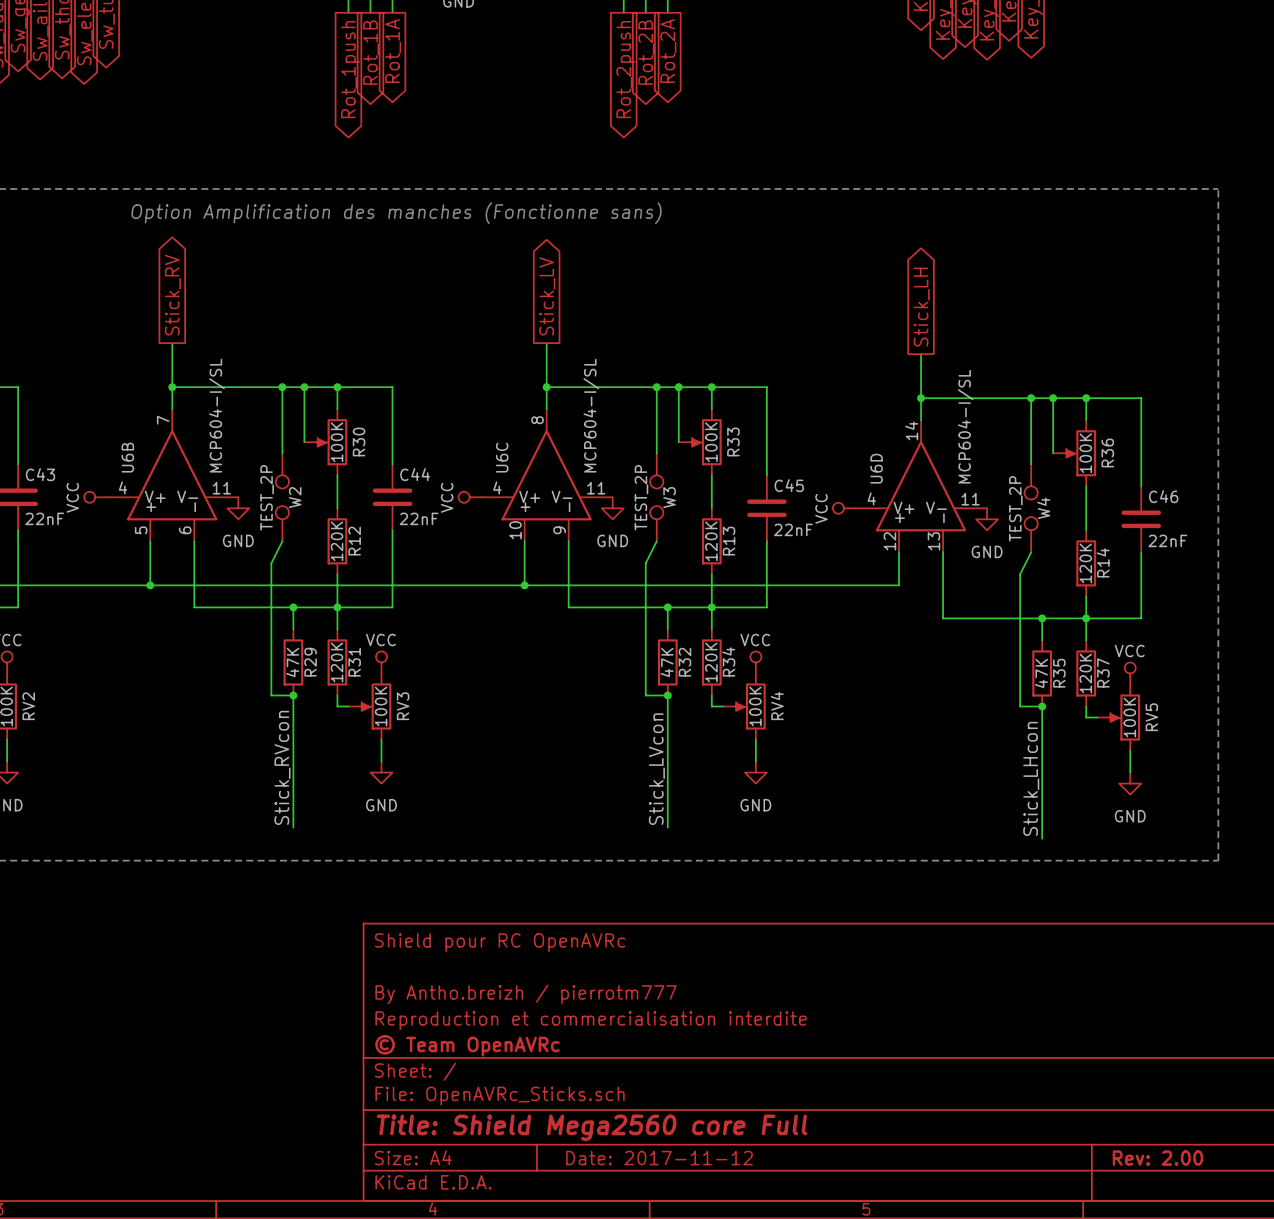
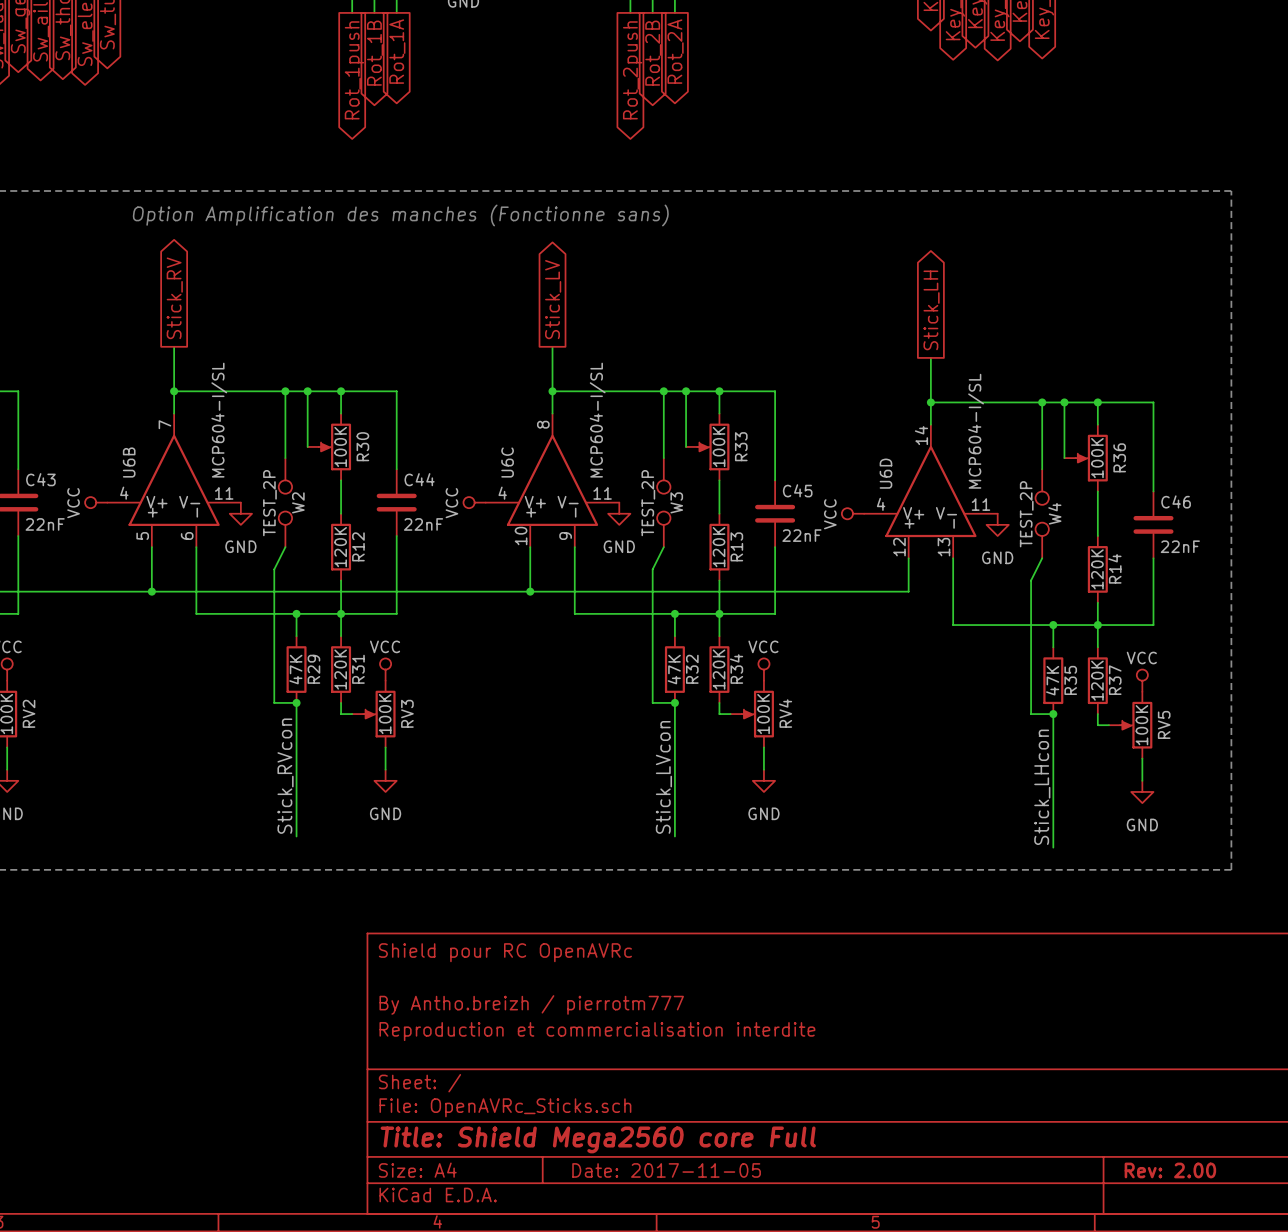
title block: © Team OpenAVRc (467, 1045) -> none
title block: Date: 2017-11-12 (659, 1158) -> Date: 2017-11-05 (666, 1170)

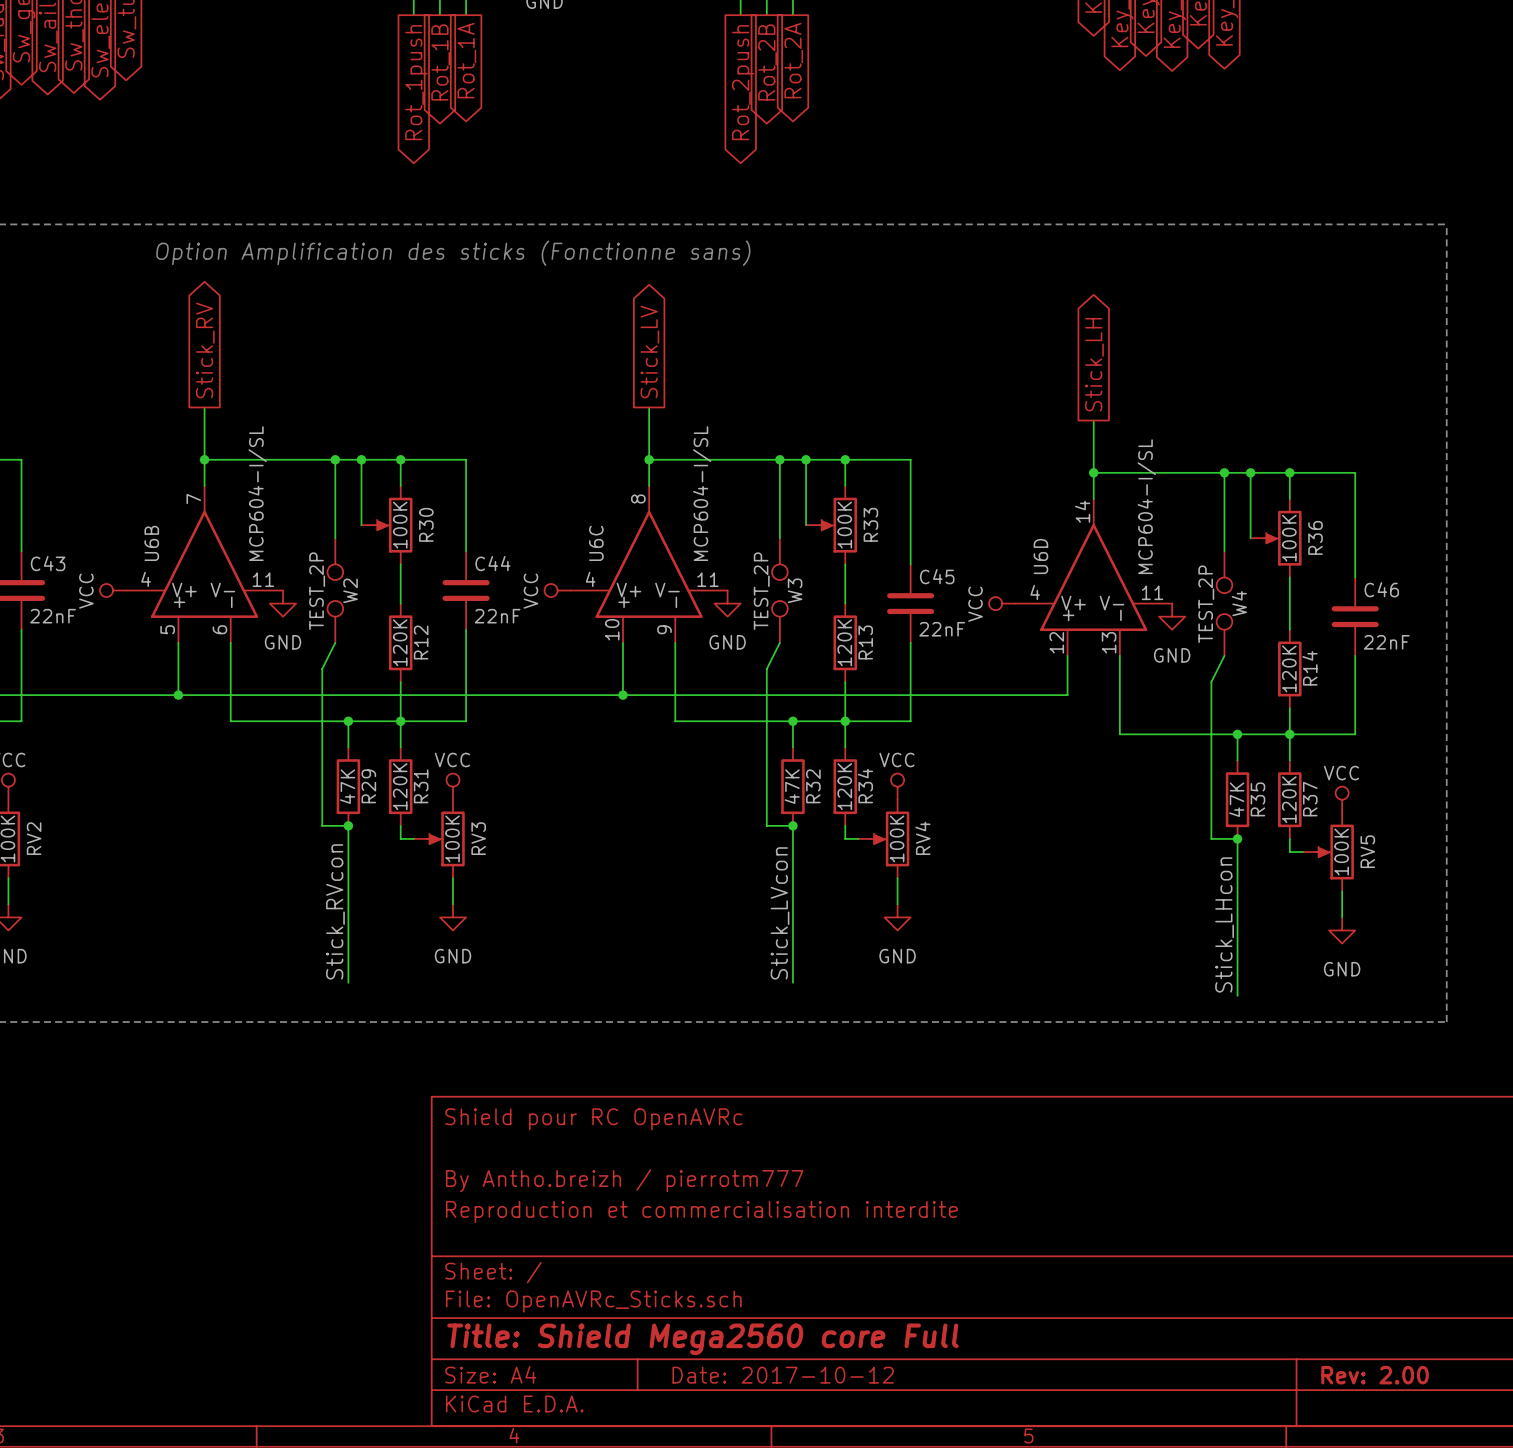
text: Option Amplification des manches (Fonctionne sans) (400, 215) -> Option Amplification des sticks (Fonctionne sans) (453, 253)
title block: Date: 2017-11-05 (666, 1170) -> Date: 2017-10-12 (783, 1375)

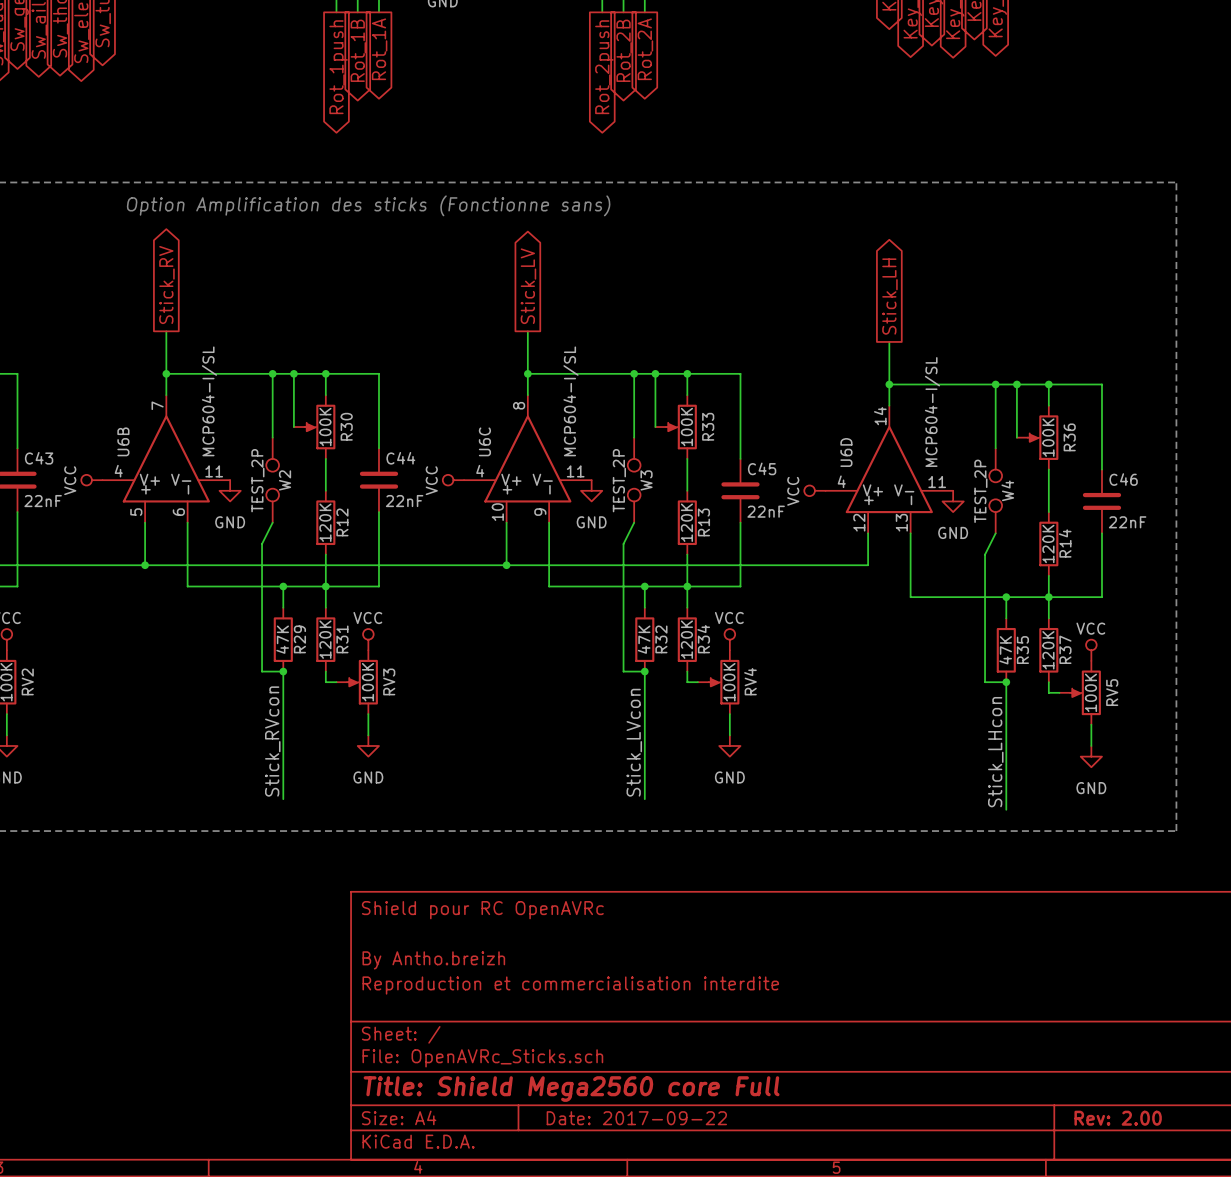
title block: By Antho.breizh / pierrotm777 (624, 1180) -> By Antho.breizh (433, 960)
title block: Date: 2017-10-12 (783, 1375) -> Date: 2017-09-22 (636, 1118)

